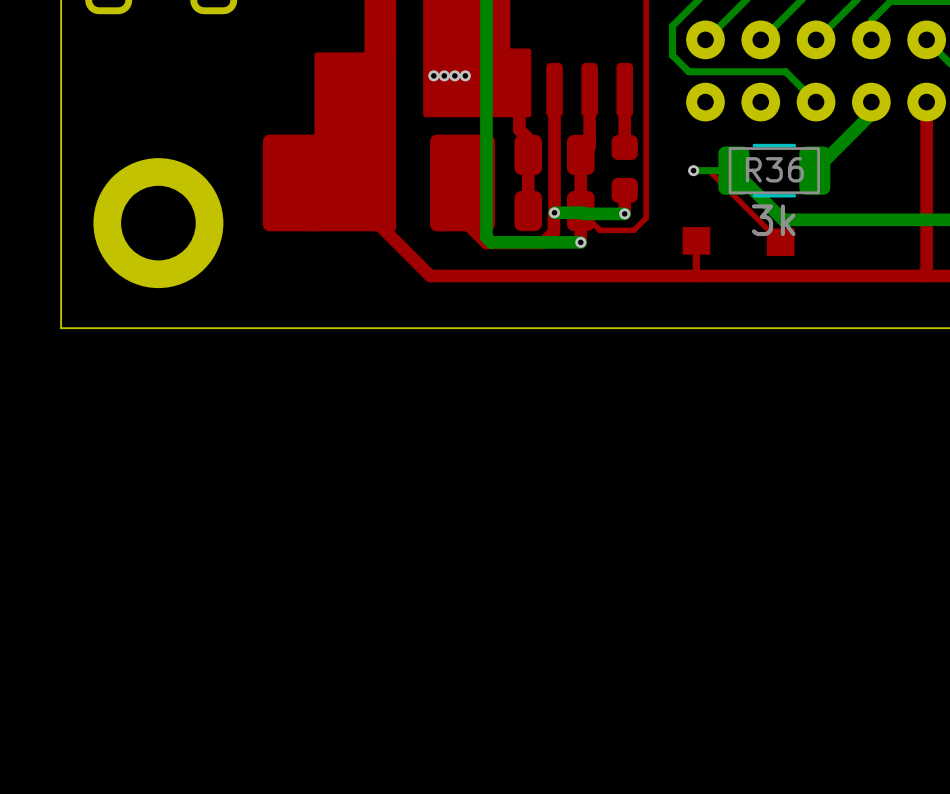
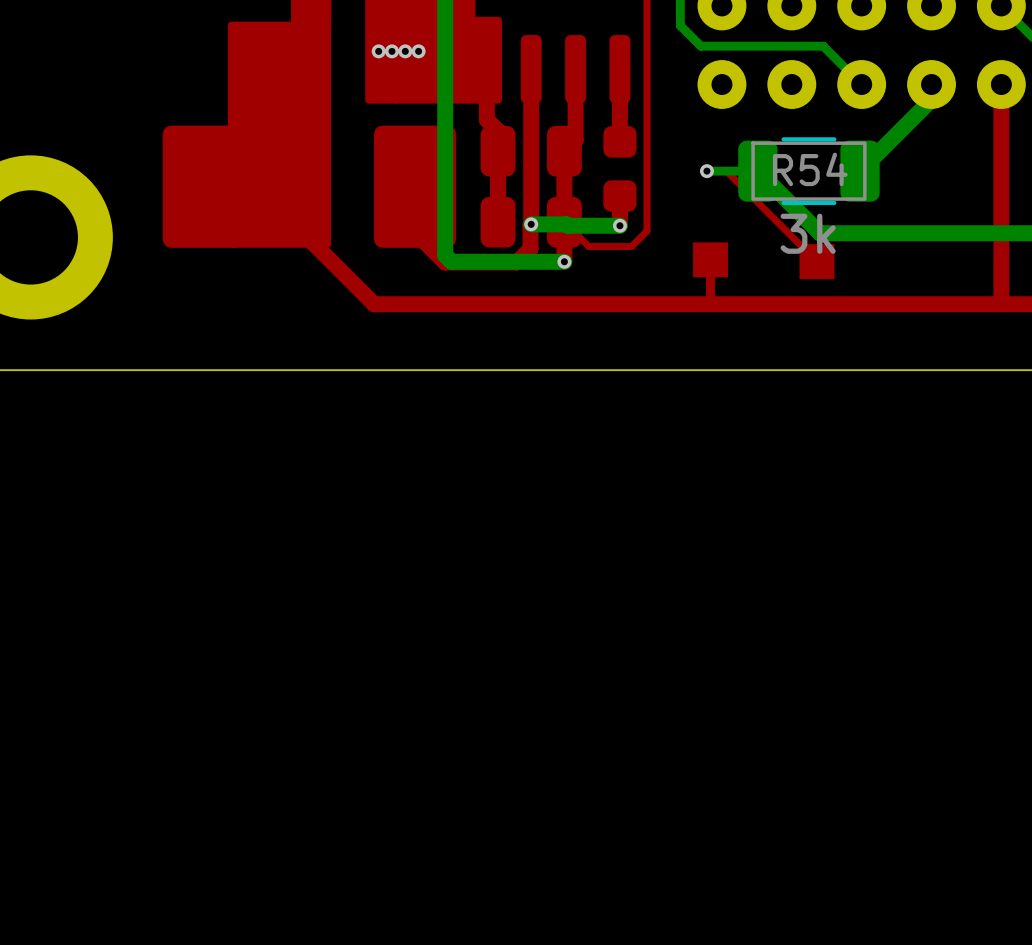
R36 name: R36 (774, 169) -> R54 (810, 169)

